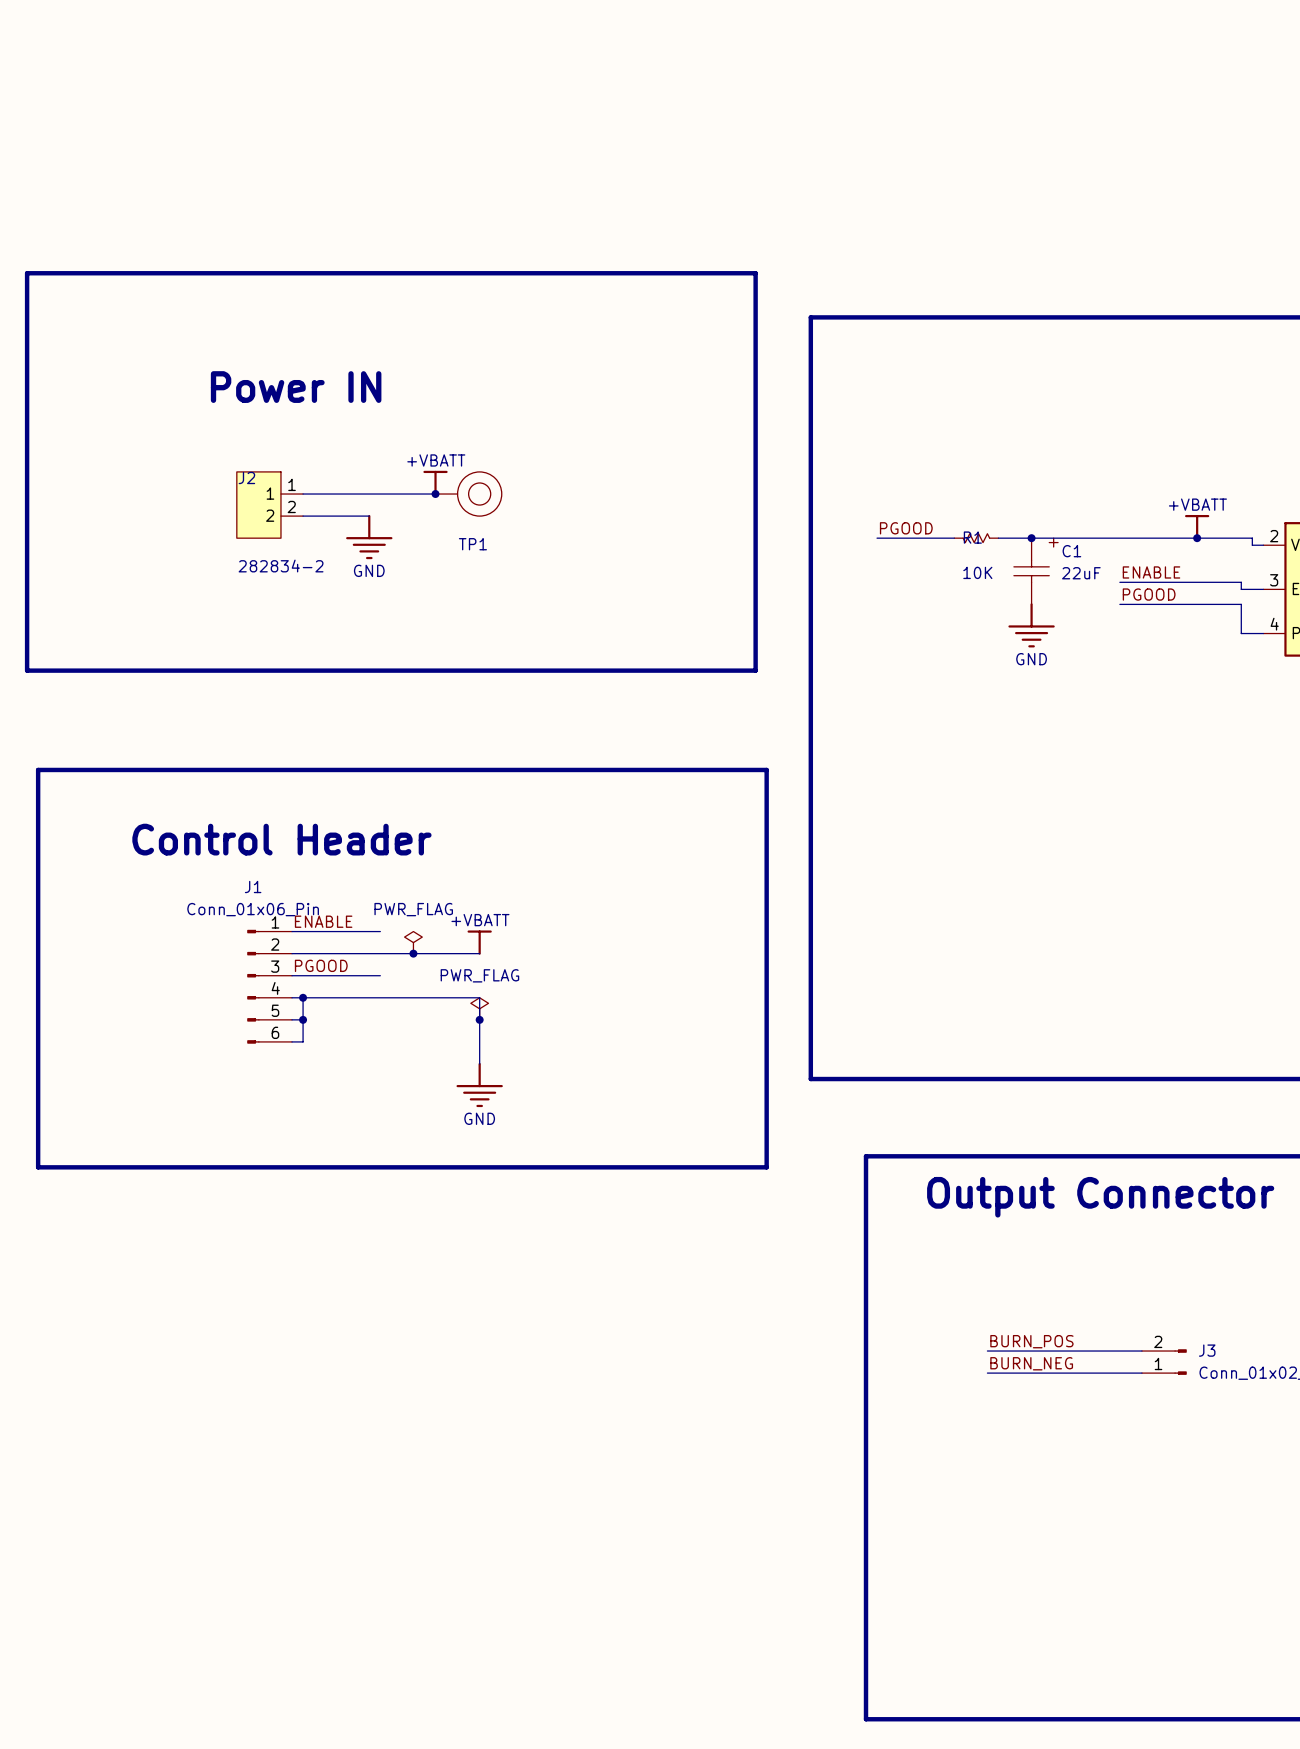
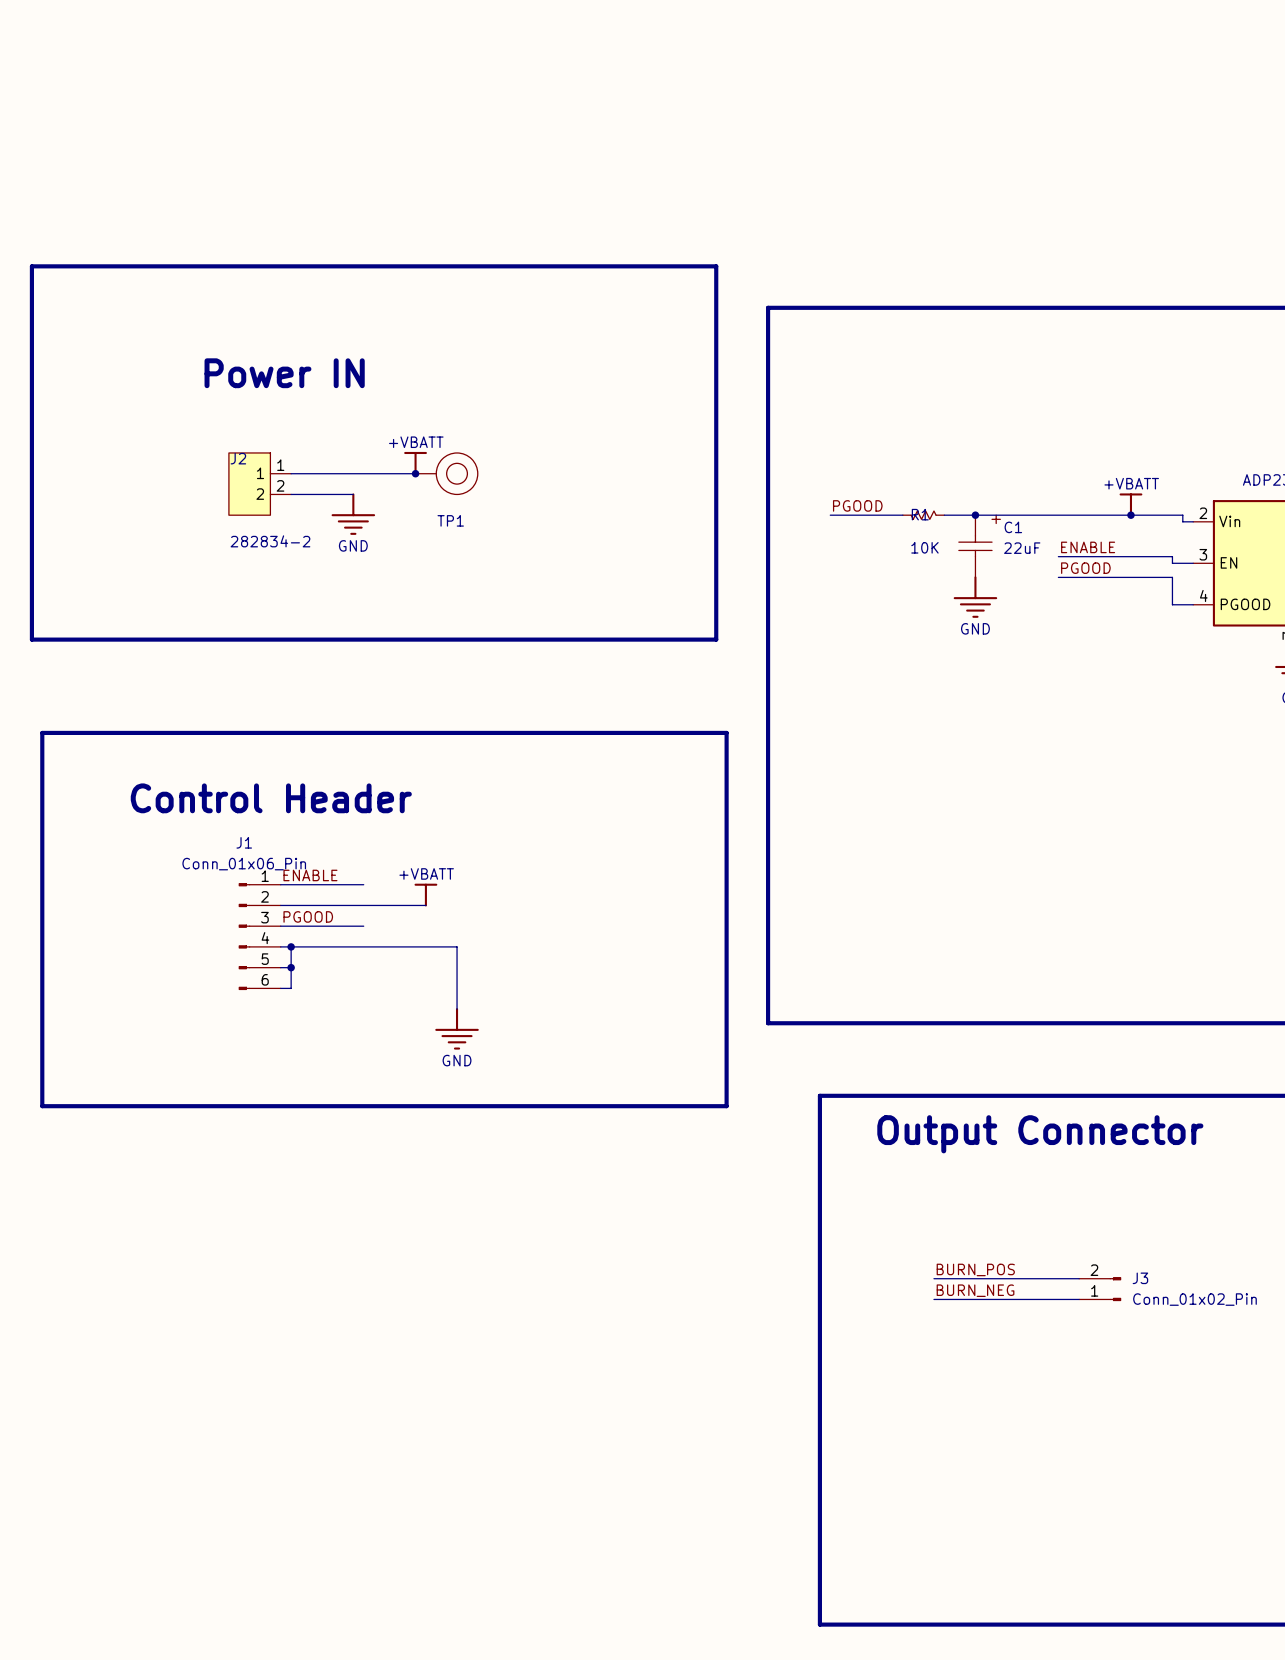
power symbol: PWR_FLAG (413, 942) -> none
power symbol position: +VBATT (479, 942) -> +VBATT (425, 895)
junction: (413, 953) -> none
wire: (446, 953) (479, 953) -> none
power symbol: PWR_FLAG (479, 1008) -> none
junction: (479, 1019) -> none

